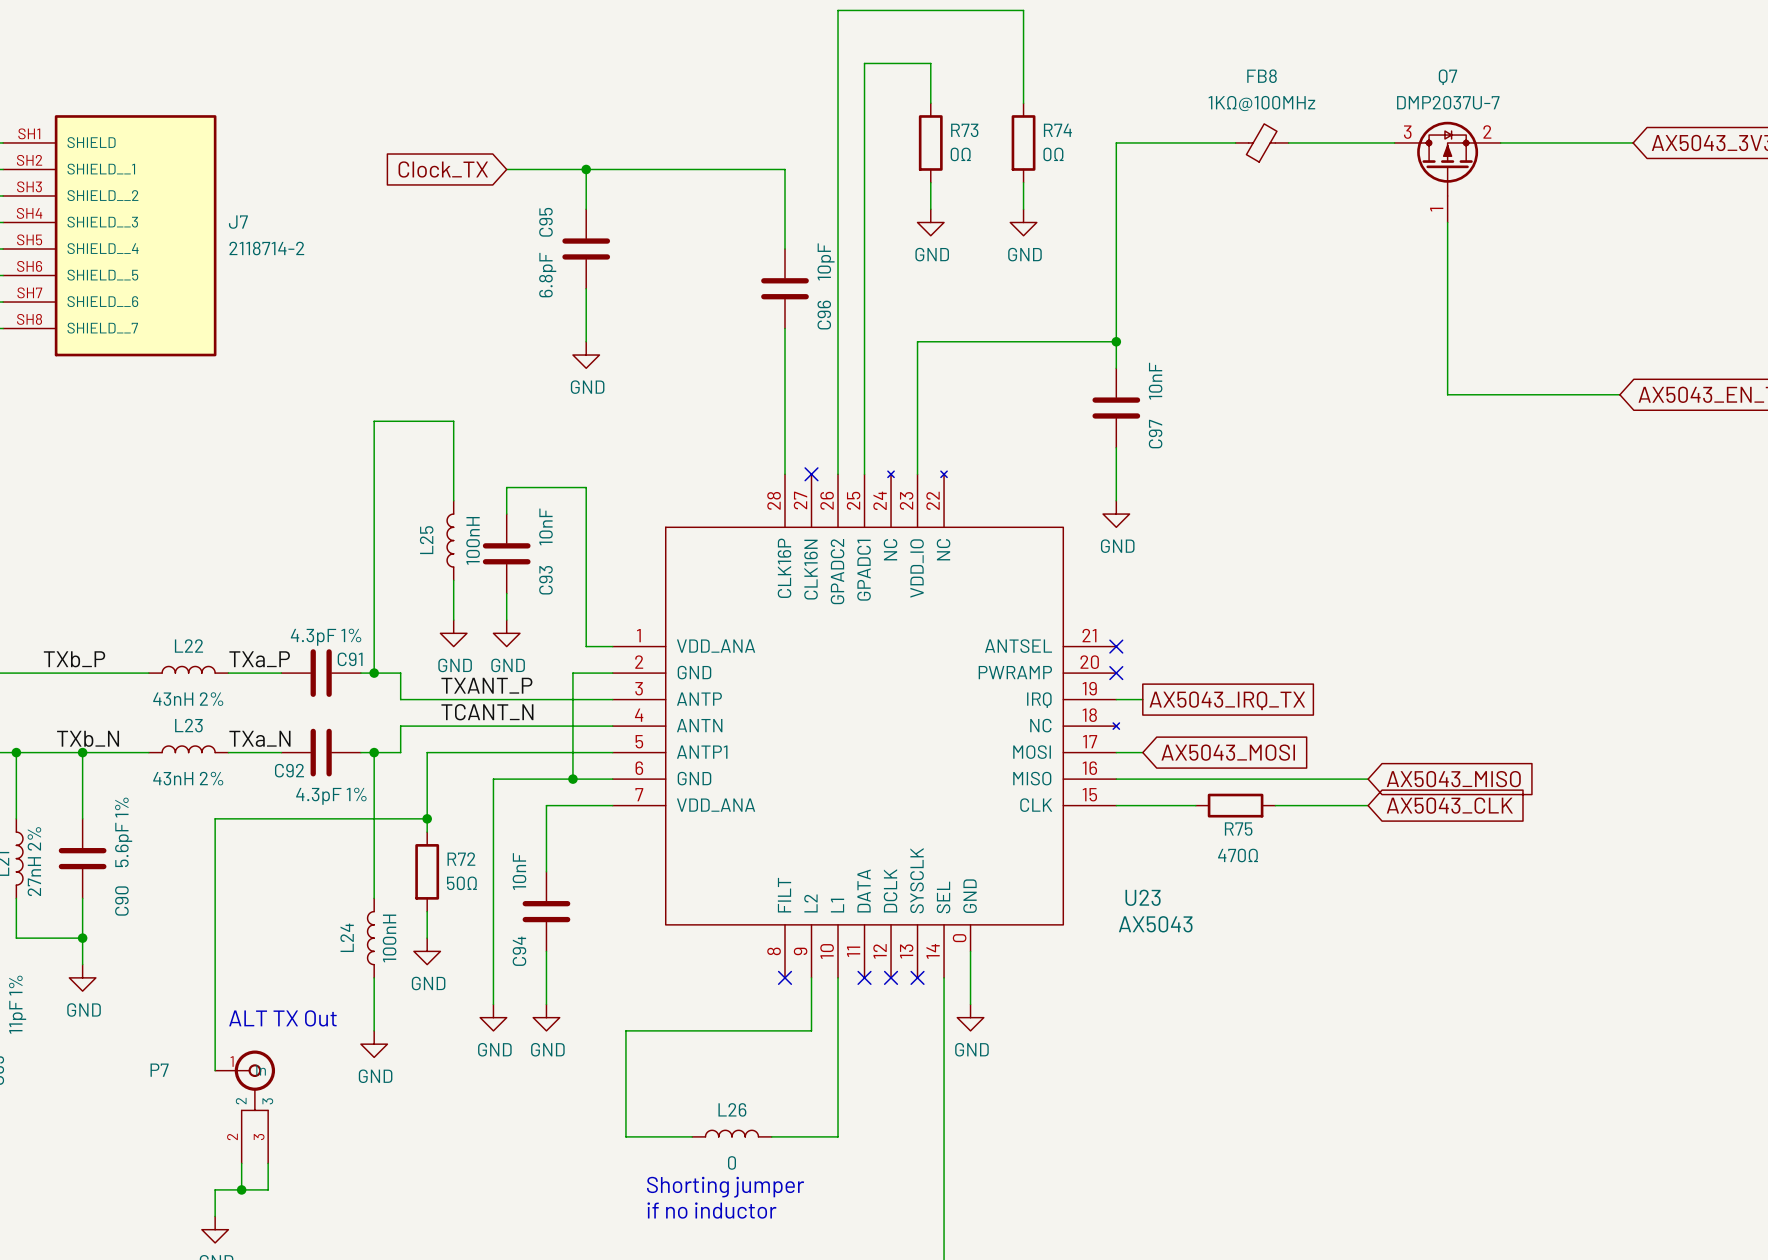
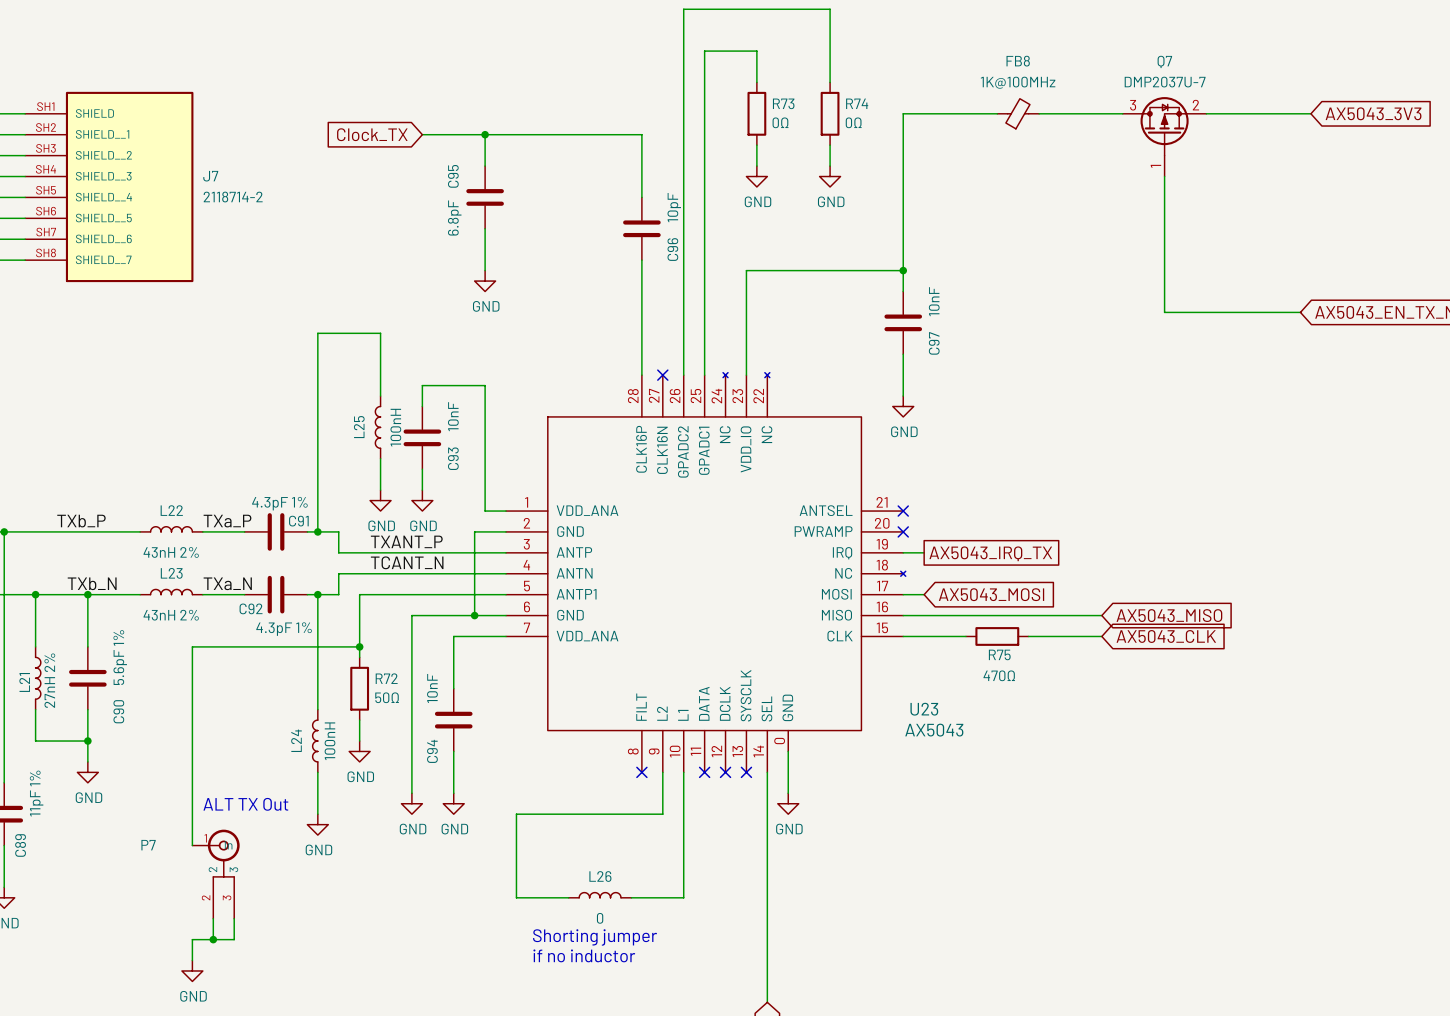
FB8 value: 1KΩ@100MHz (1261, 103) -> 1K@100MHz (1018, 82)

